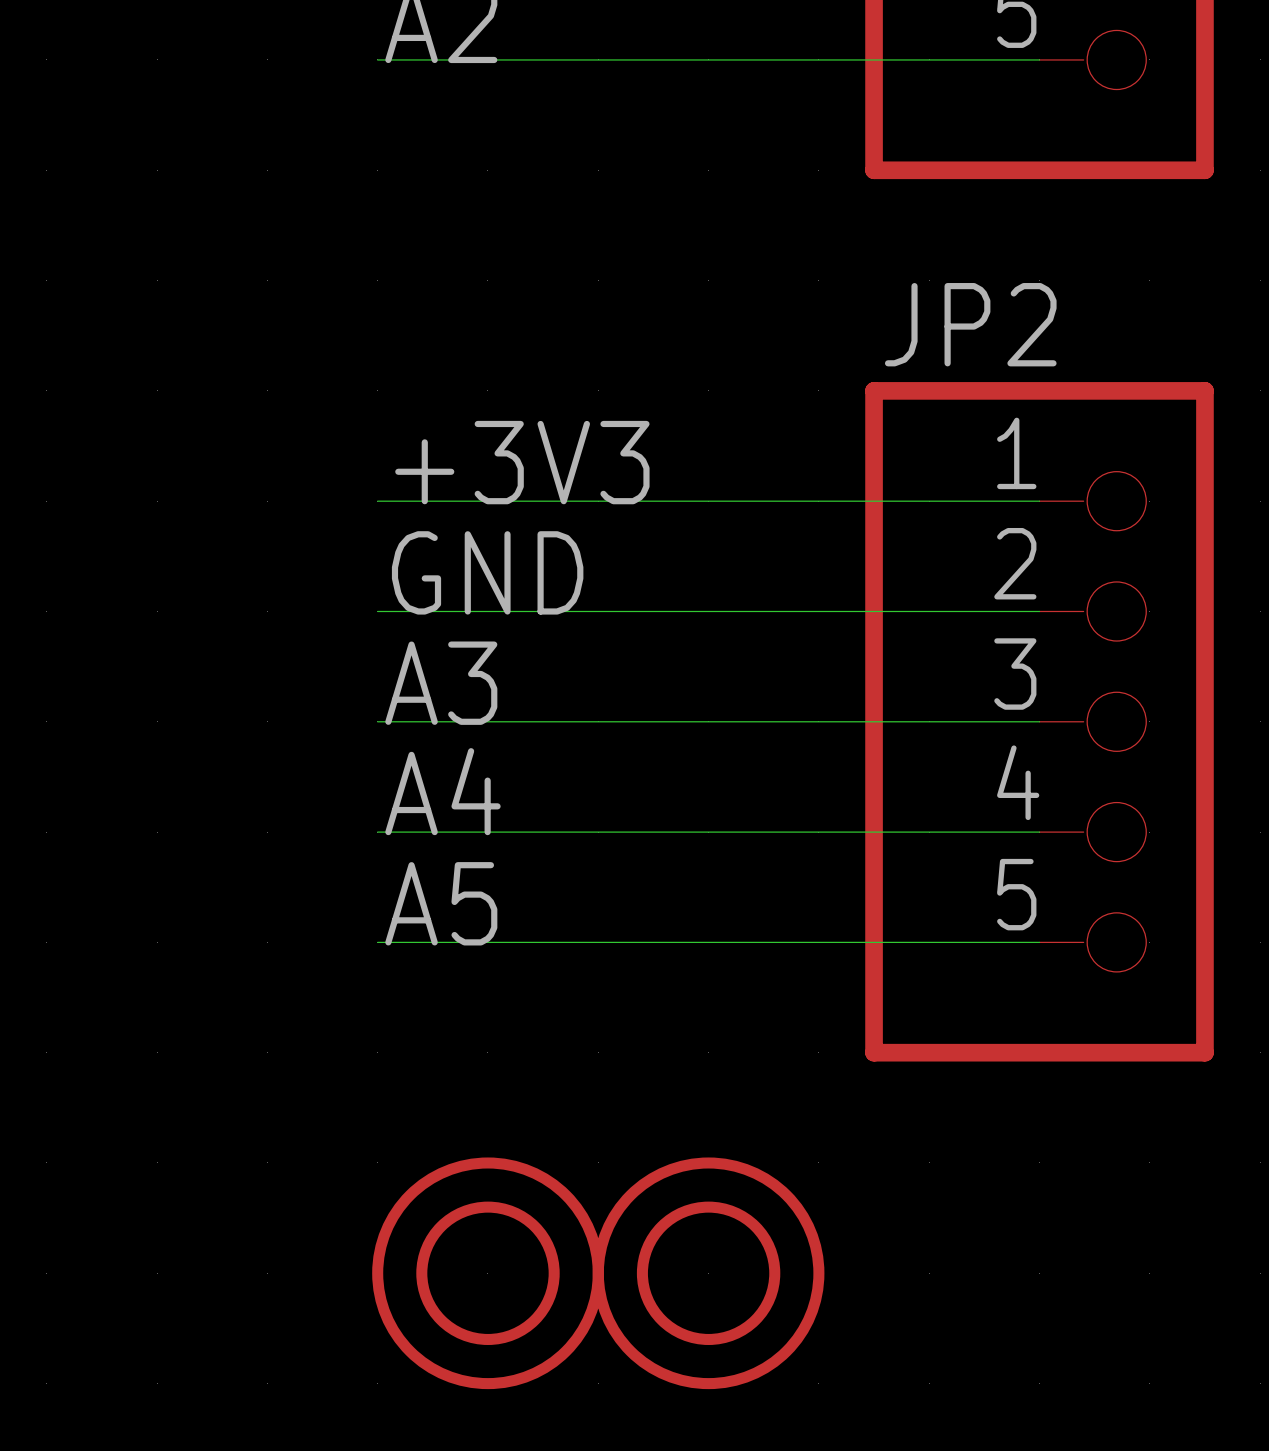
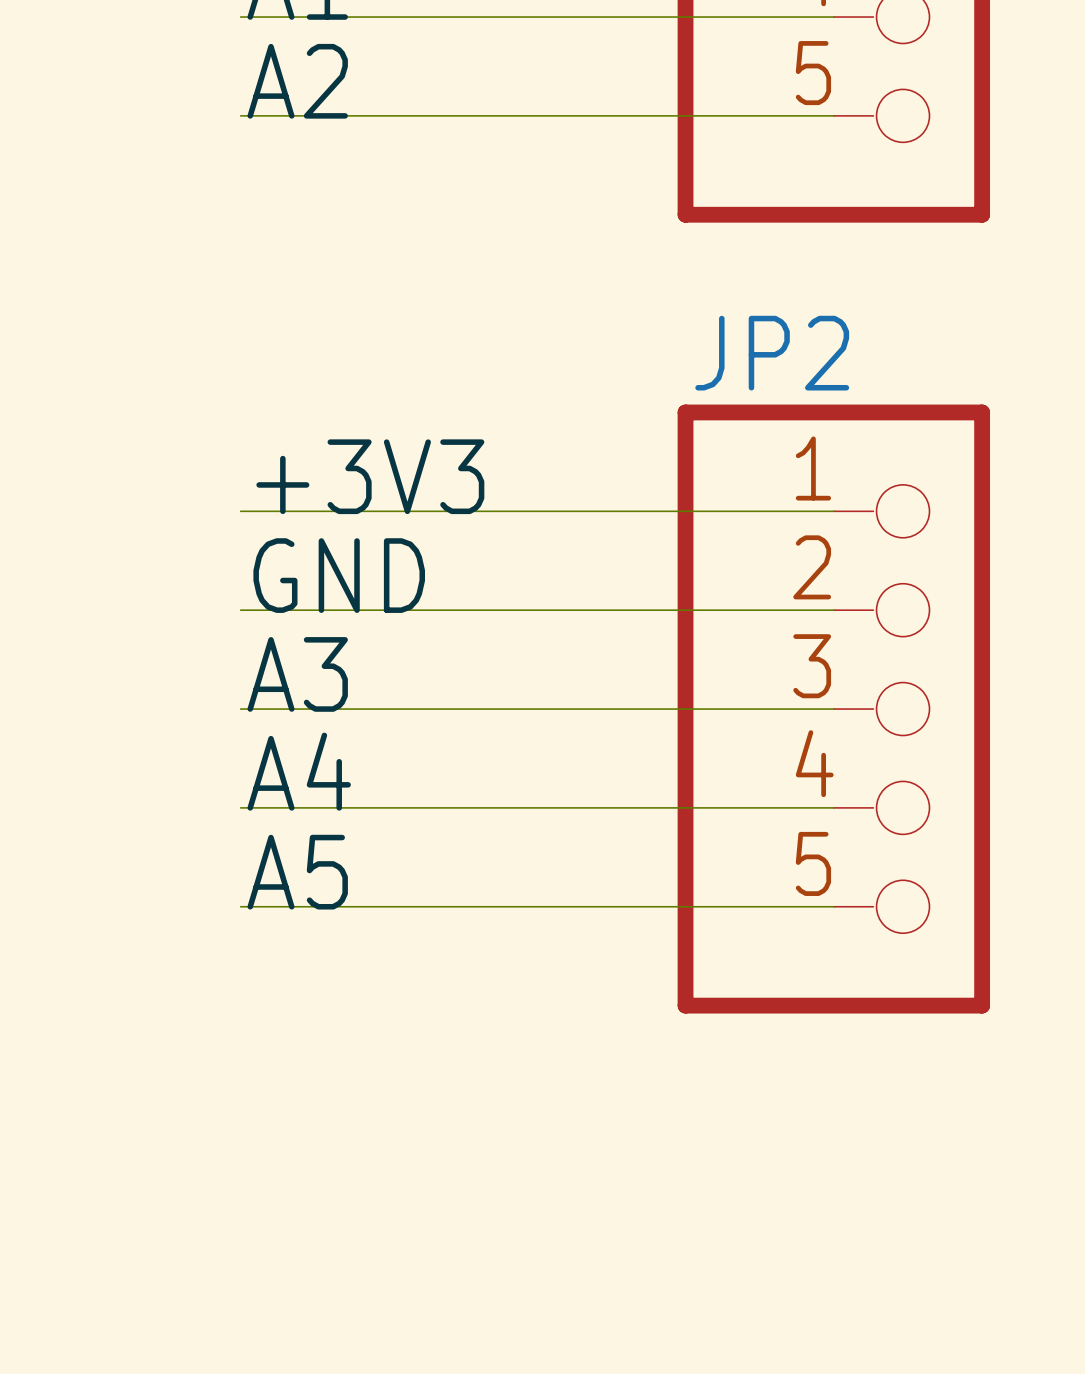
part: (487, 1273) -> none
part: (708, 1273) -> none

